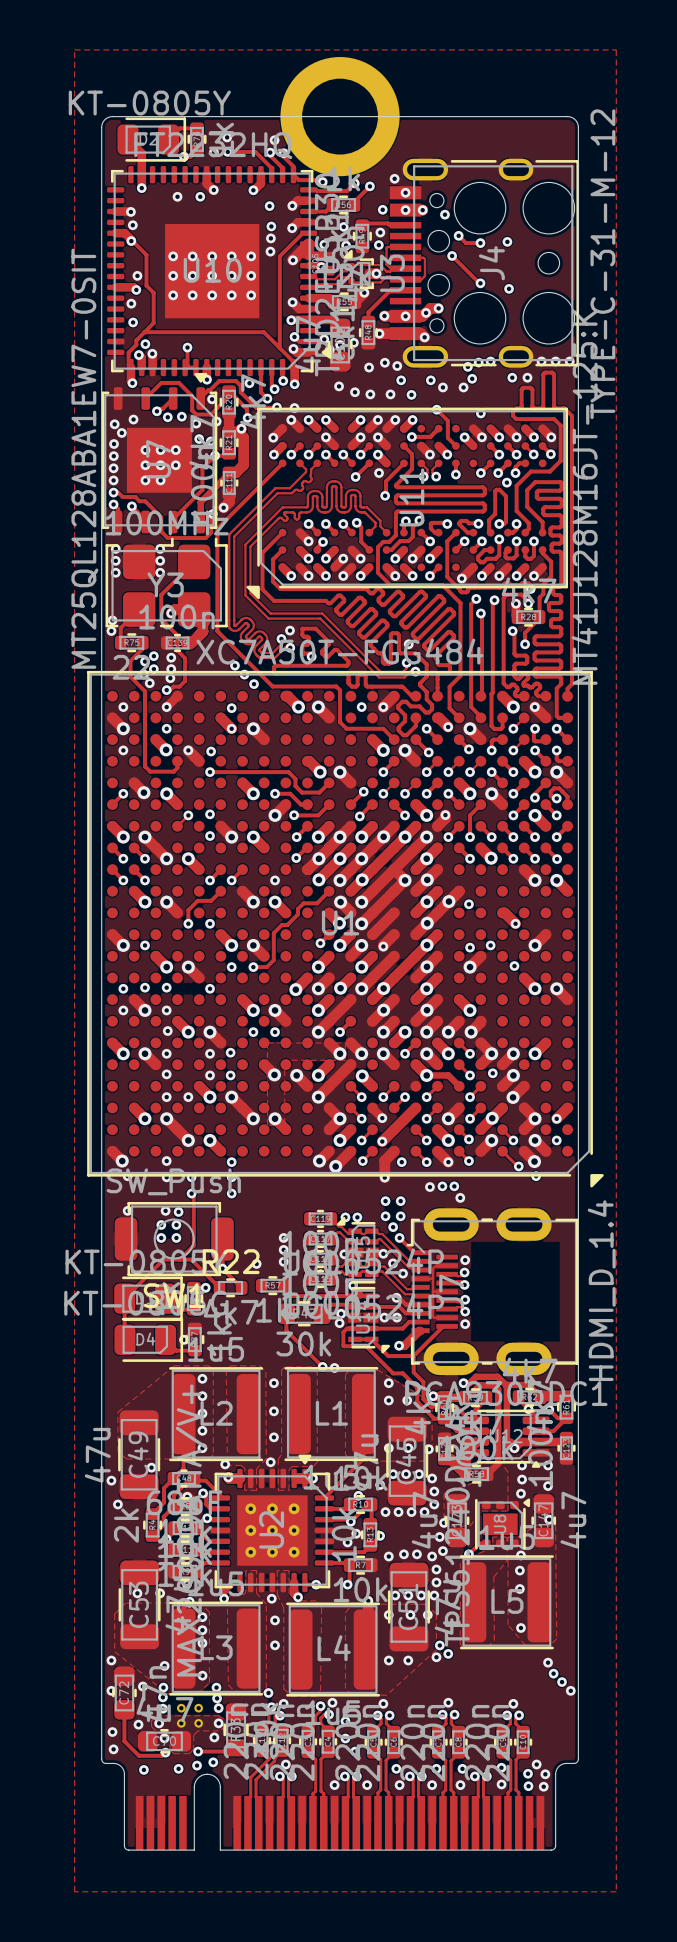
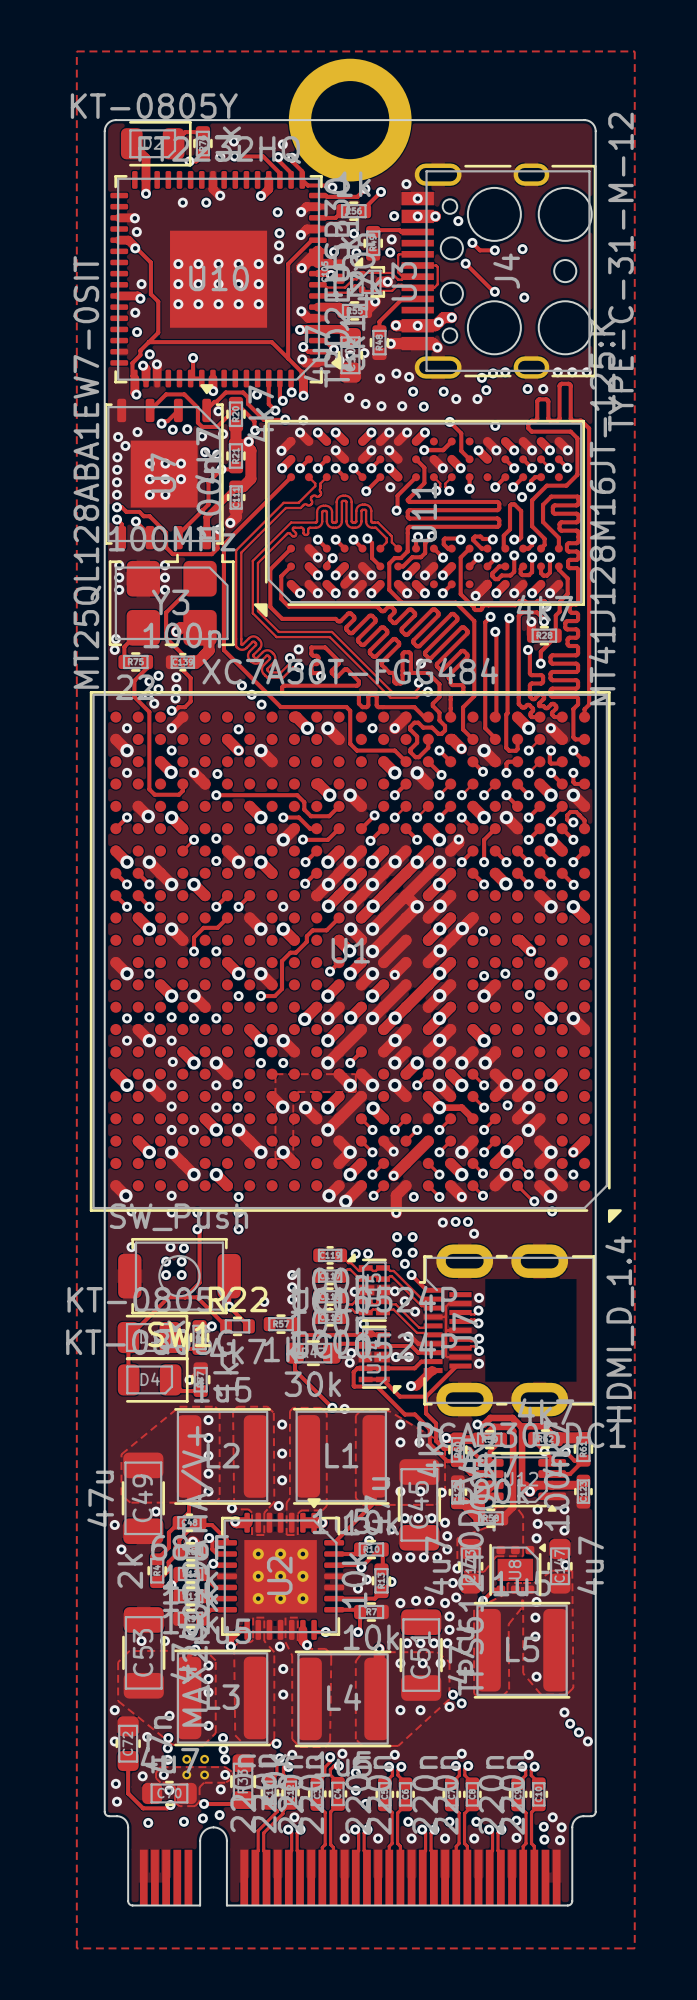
via: none -> (193, 1018)

